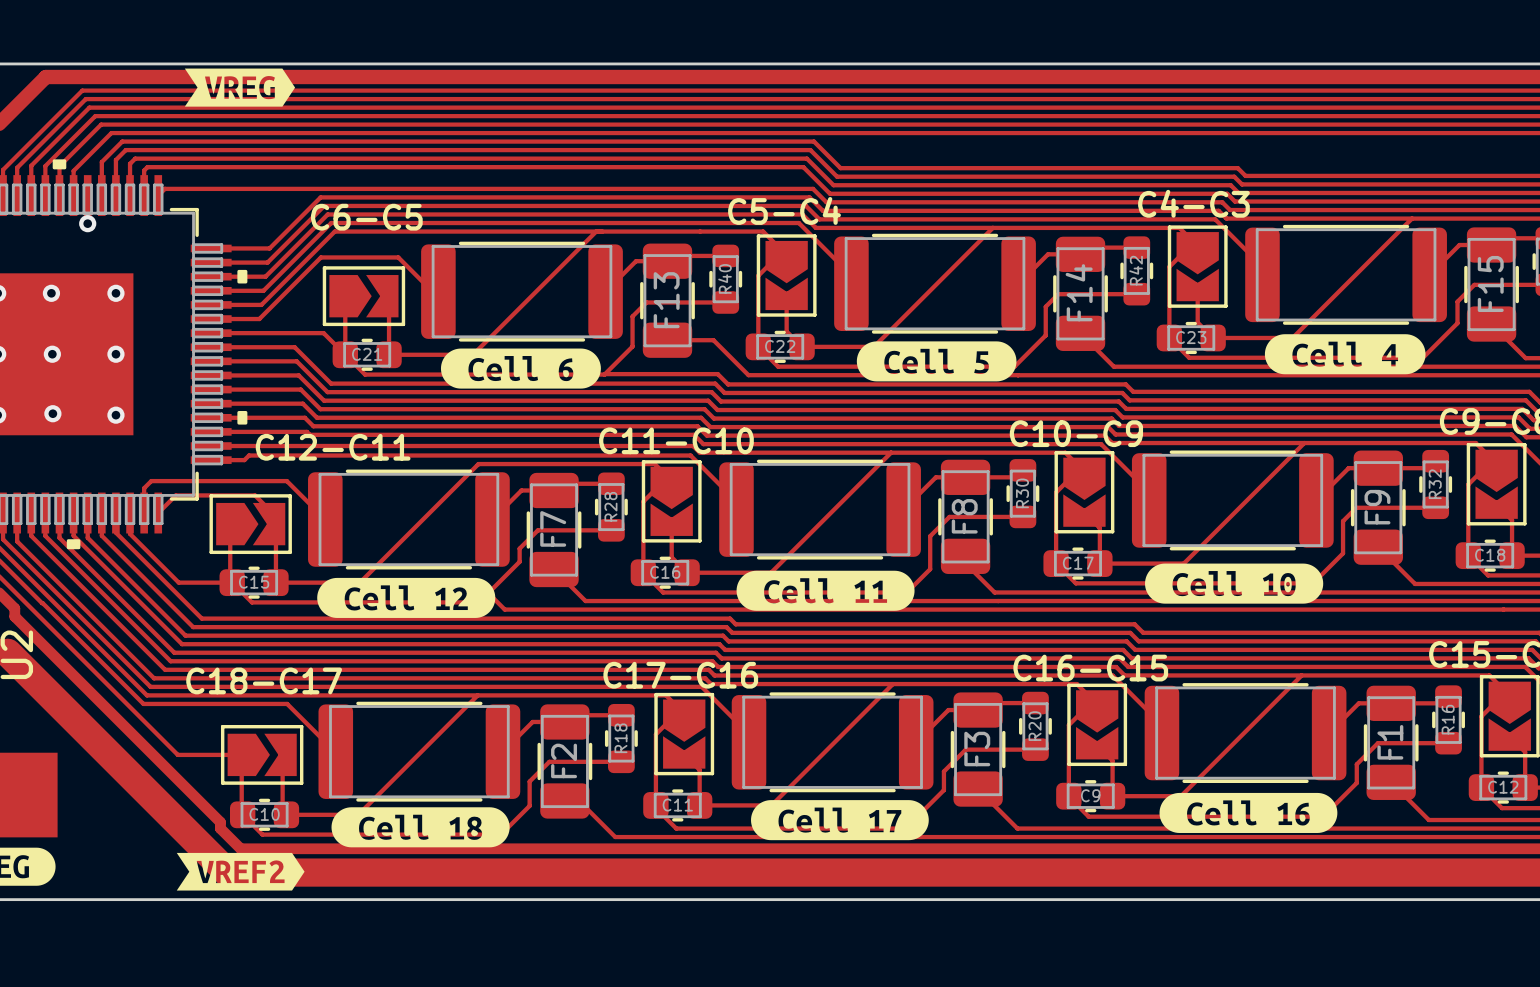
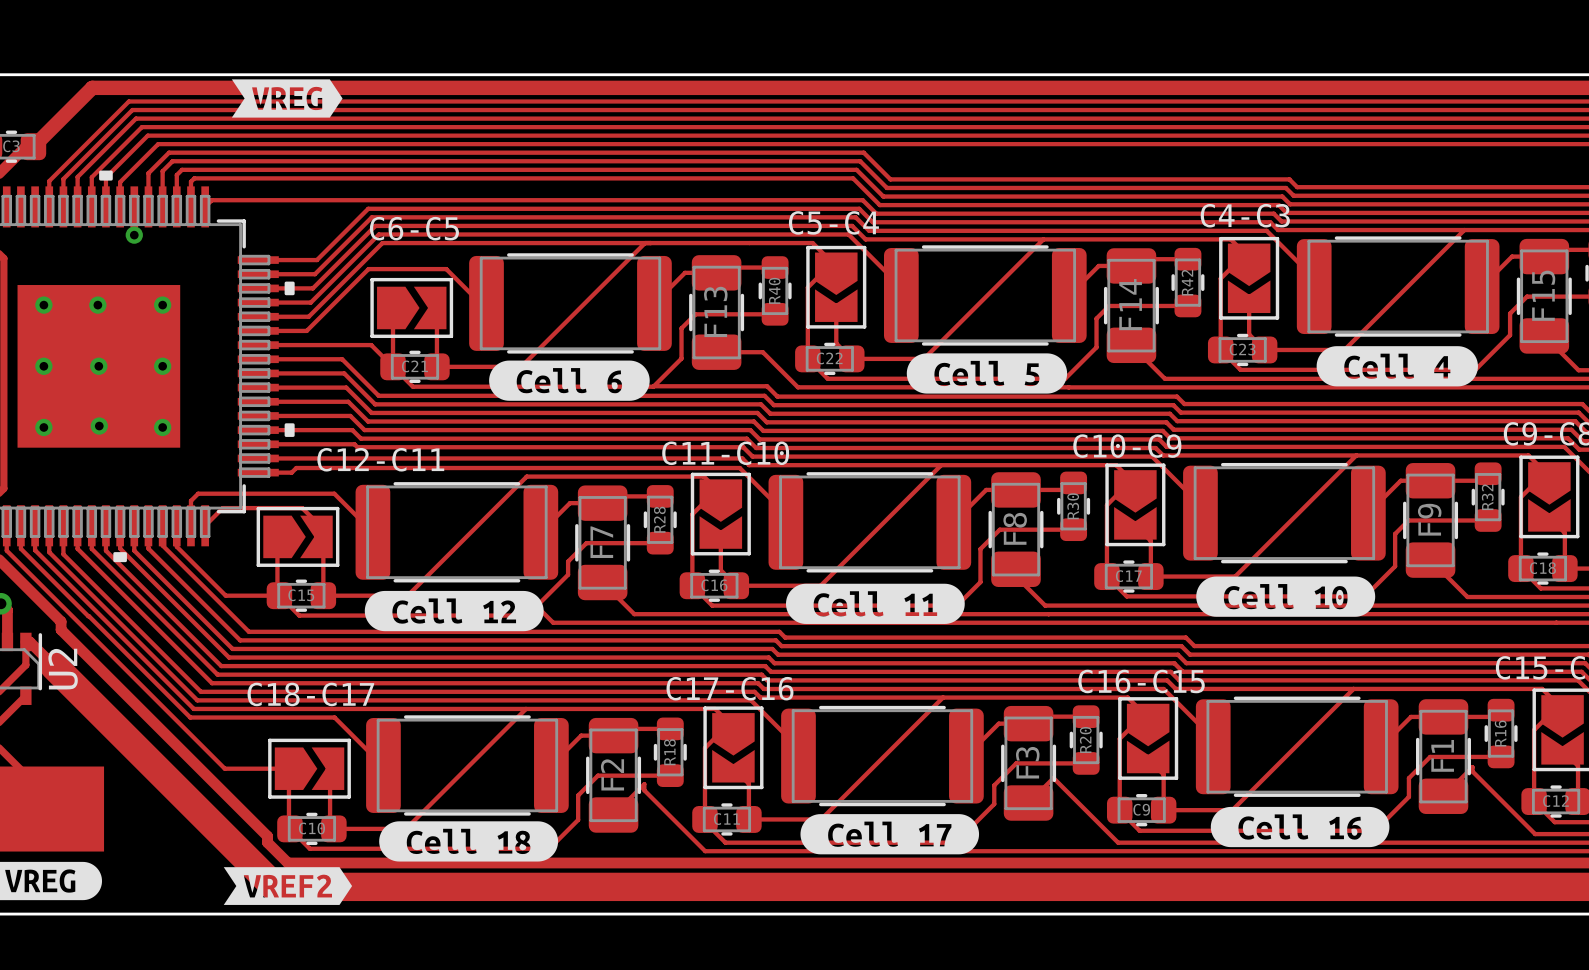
track: (1391, 782) (1428, 820) (1482, 820) -> (1443, 796) (1472, 767) (1472, 771) (1535, 834)
track: (978, 789) (1017, 828) (1067, 828) -> (1028, 803) (1053, 778) (1118, 842)
track: (564, 800) (579, 800) (615, 837) (656, 837) -> (613, 814) (644, 784) (644, 790) (705, 851)

